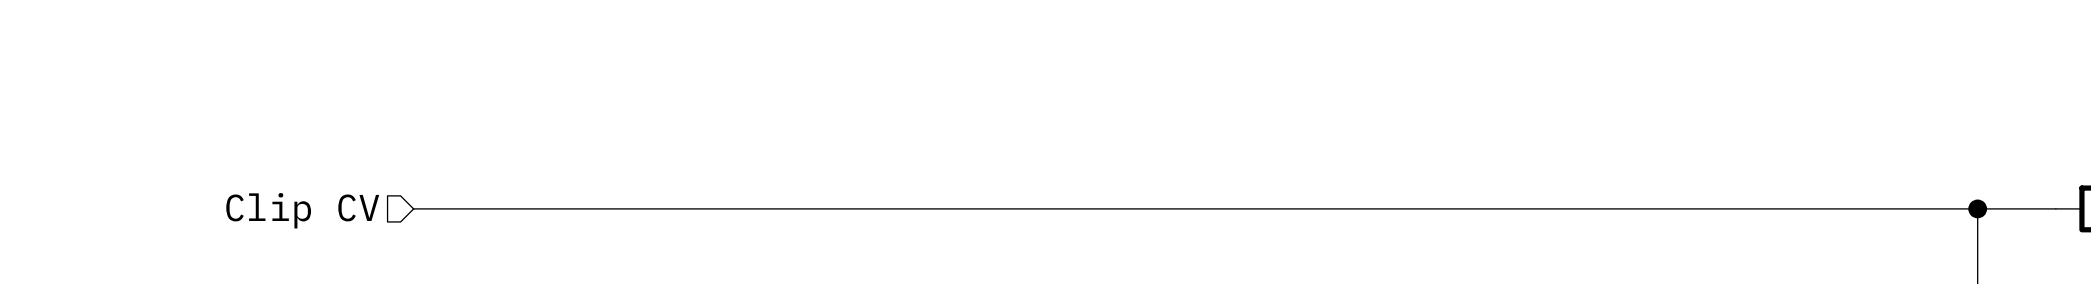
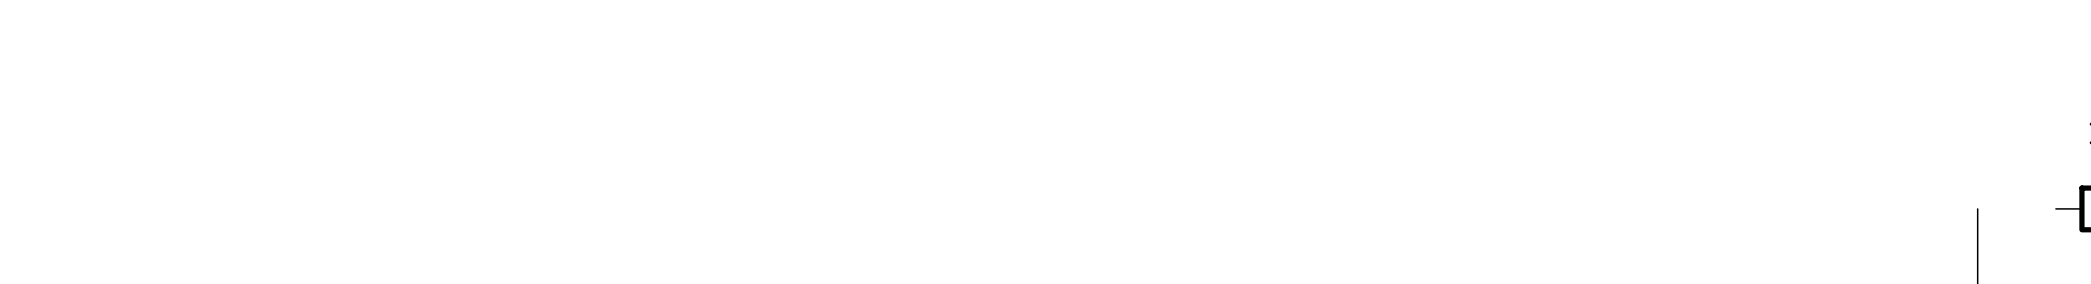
wire: (413, 208) (2055, 208) -> none
junction: (1977, 208) -> none
hierarchical label: Clip CV (302, 210) -> none

